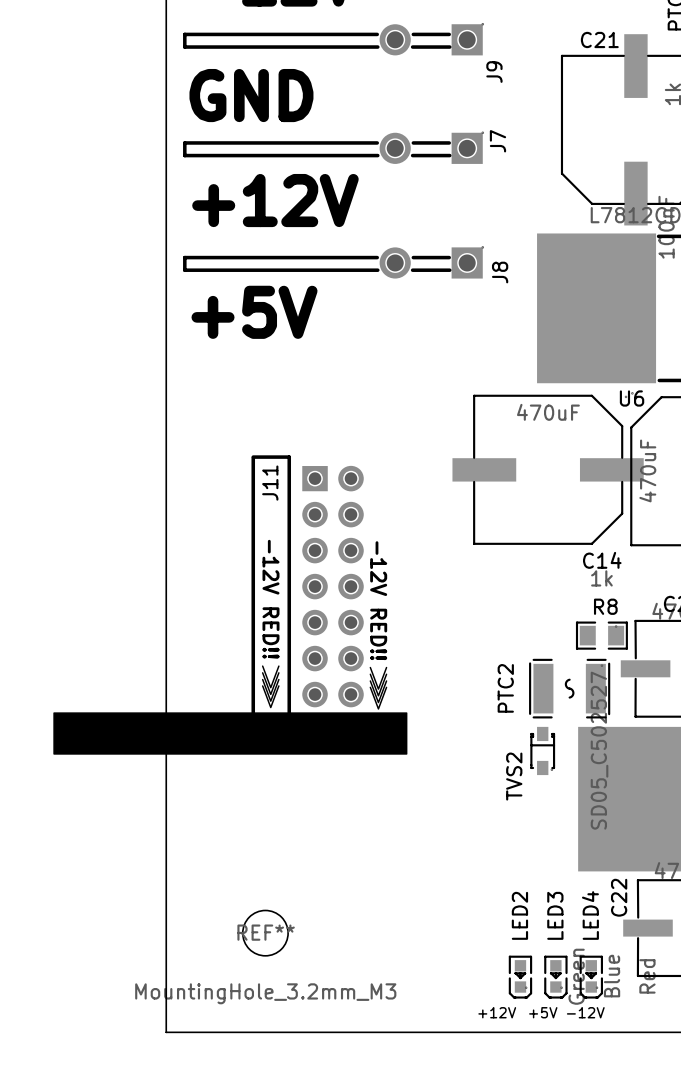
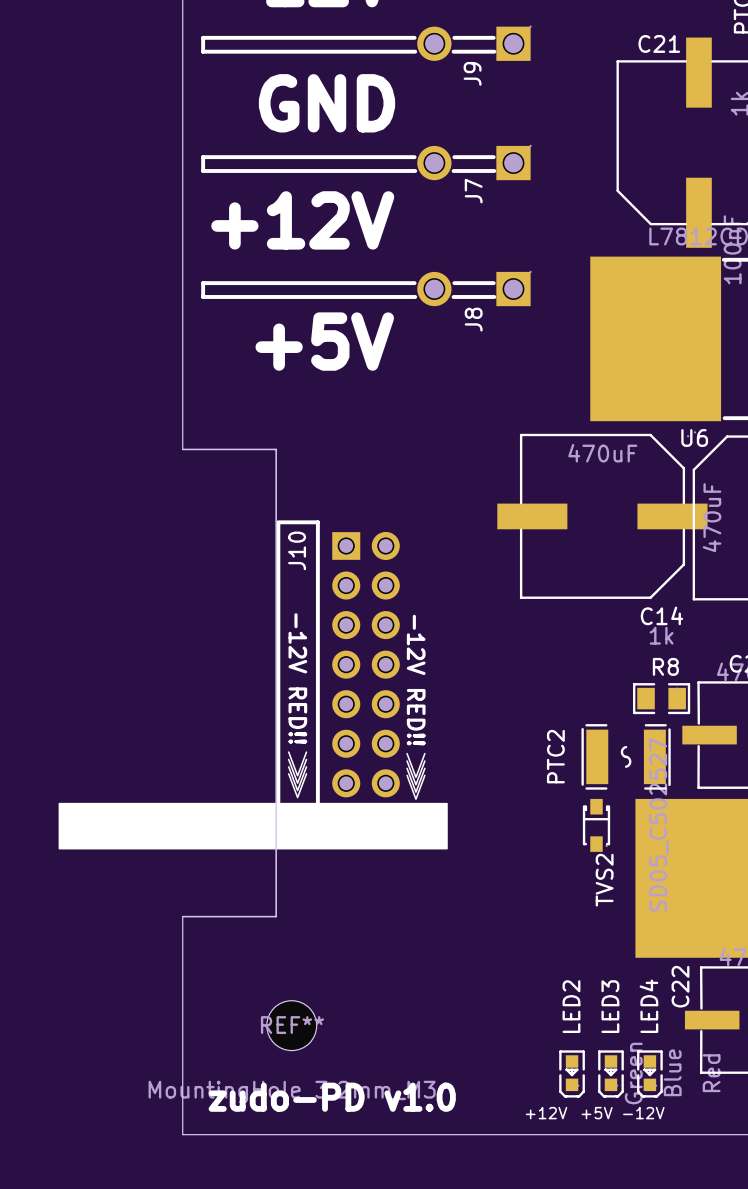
J9 name position: J9 (494, 72) -> J9 (472, 73)
text position: GND (251, 95) -> GND (327, 103)
J7 name position: J7 (497, 141) -> J7 (473, 191)
J8 name position: J8 (500, 272) -> J8 (473, 319)
text position: +5V (254, 312) -> +5V (324, 341)
board edge: (166, 408) (166, 833) -> (182, 449) (276, 449) (276, 916) (182, 916)
J11: (230, 605) -> none
J10: none -> (253, 684)
TVS2 name position: TVS2 (514, 776) -> TVS2 (604, 880)
text: none -> zudo-PD v1.0 (332, 1097)

